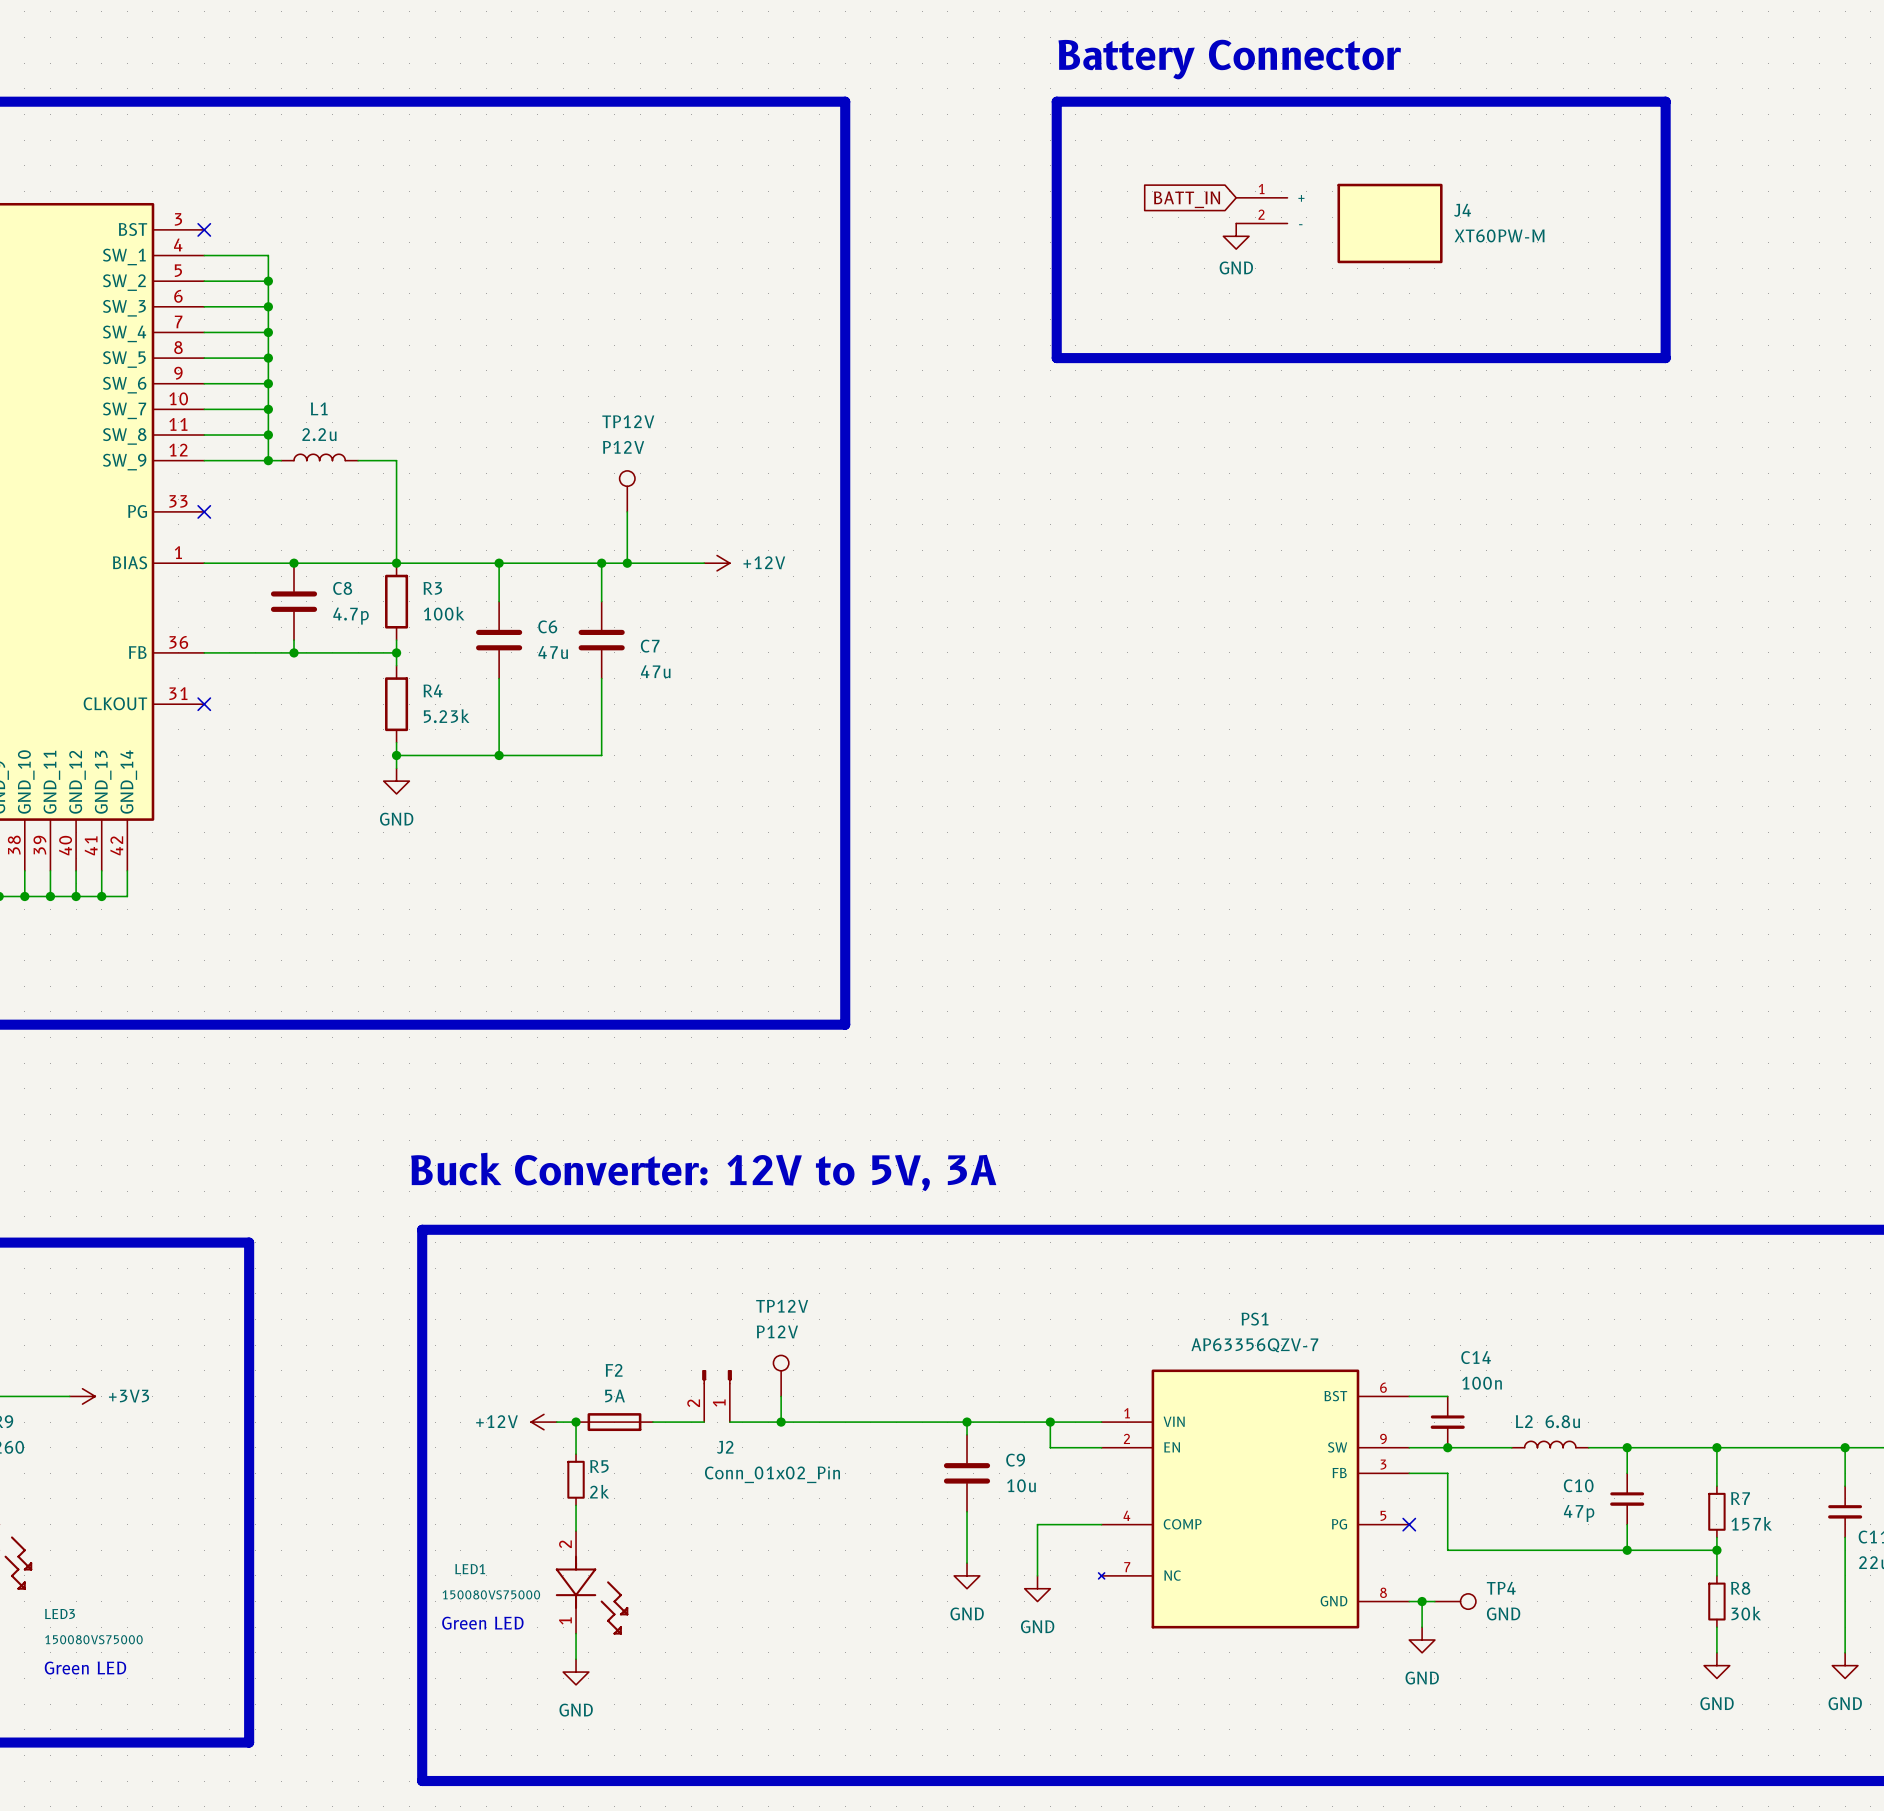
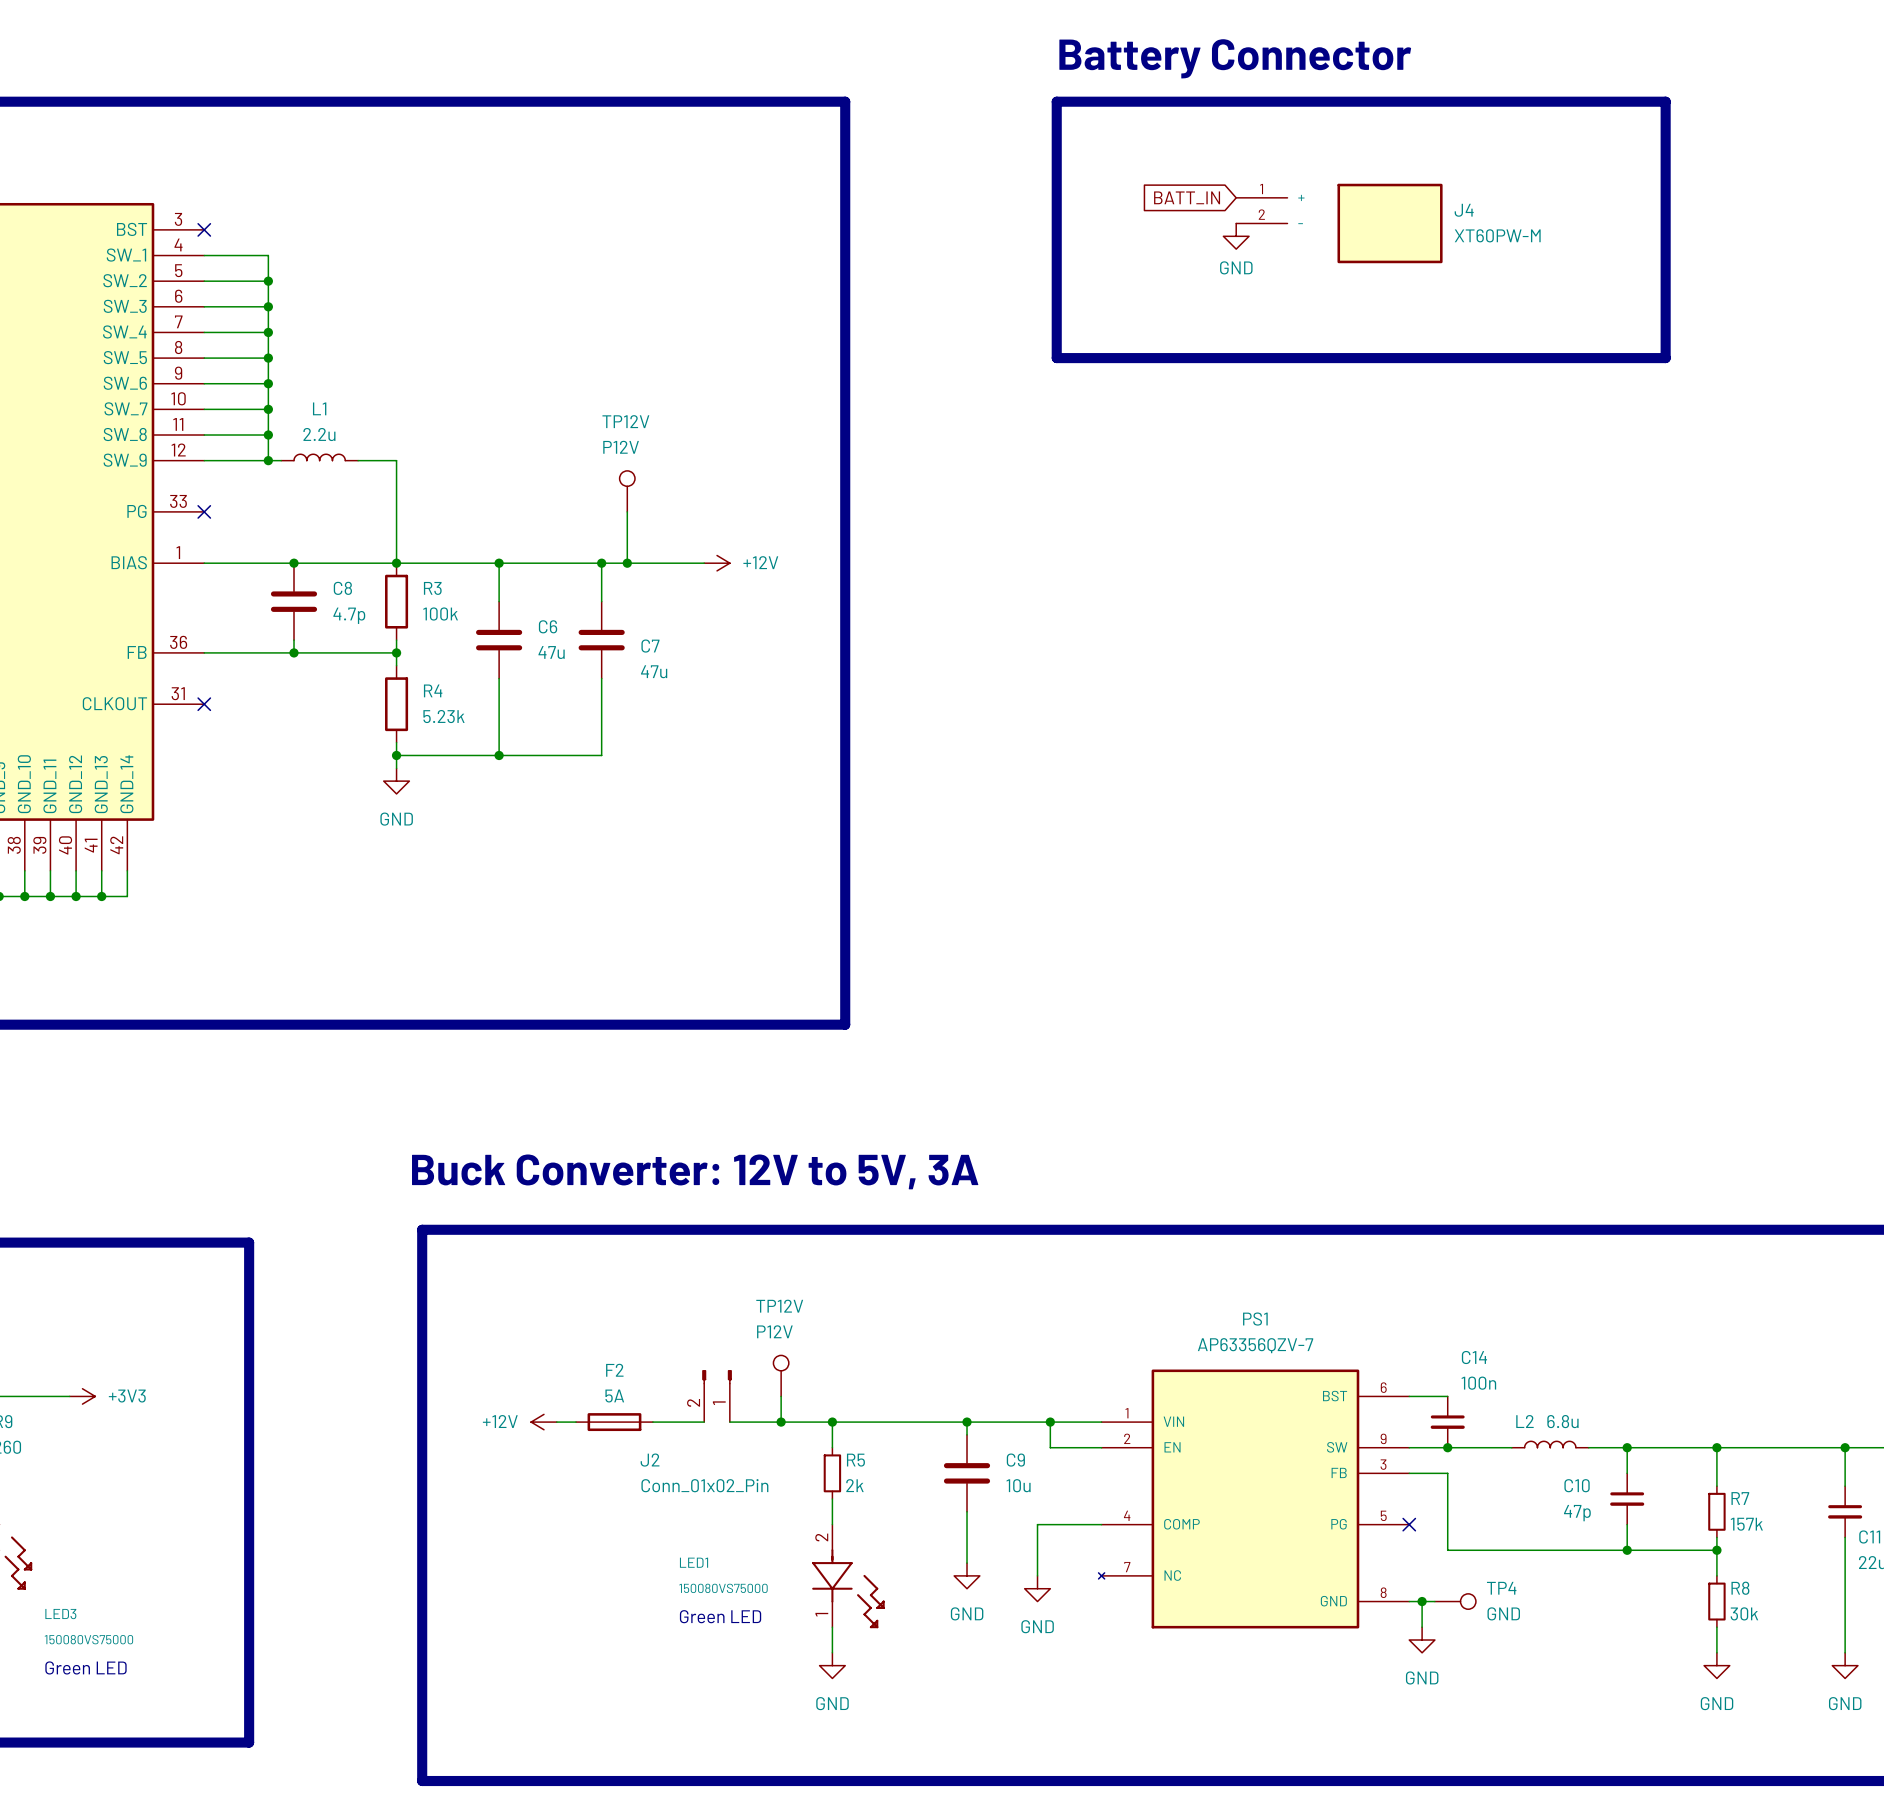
wire: (576, 1422) (576, 1454) -> none
junction: (576, 1422) -> none
wire: none -> (832, 1422) (832, 1447)
junction: none -> (832, 1422)
J2 name position: J2 (725, 1447) -> J2 (650, 1460)
J2 value position: Conn_01x02_Pin (772, 1474) -> Conn_01x02_Pin (704, 1485)
R5 position: (576, 1479) -> (832, 1473)
wire: none -> (832, 1498) (832, 1524)
wire: (576, 1505) (576, 1531) -> none
LED1 name position: LED1 (470, 1569) -> LED1 (694, 1562)
LED1 position: (592, 1582) -> (848, 1576)
LED1 value position: 150080VS75000 (491, 1594) -> 150080VS75000 (723, 1588)
text position: Green LED (482, 1623) -> Green LED (720, 1616)
wire: none -> (832, 1627) (832, 1652)
wire: (576, 1633) (576, 1659) -> none
power symbol: none -> GND (832, 1665)
power symbol: GND (576, 1672) -> none

